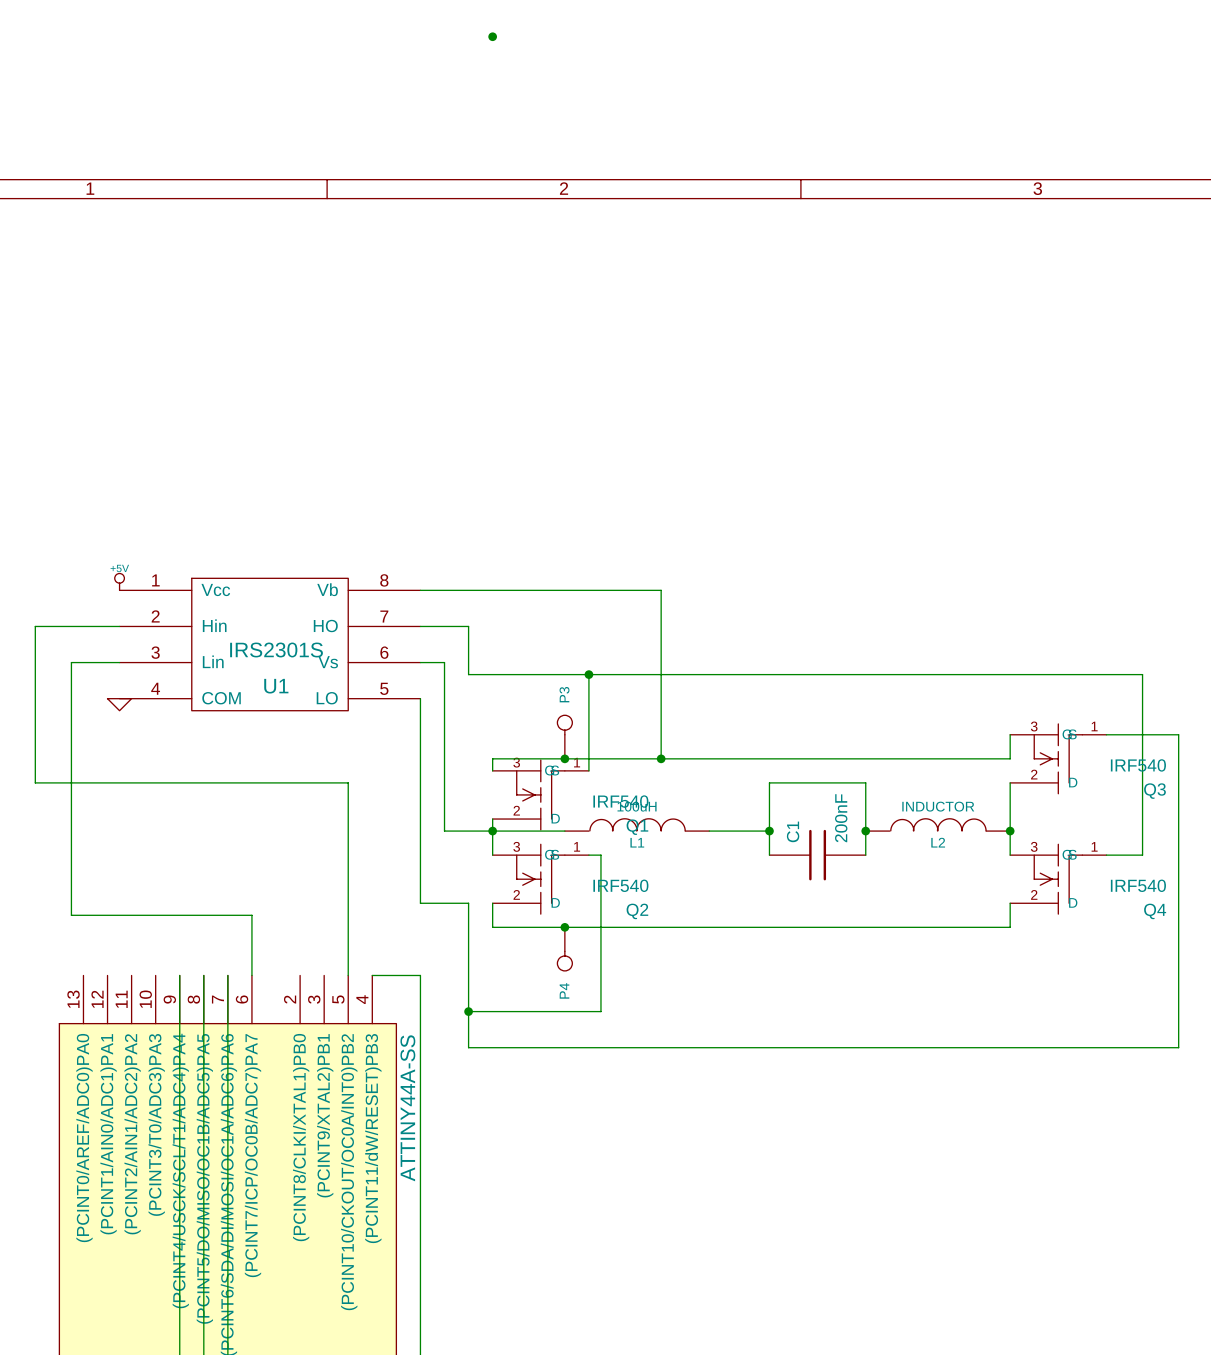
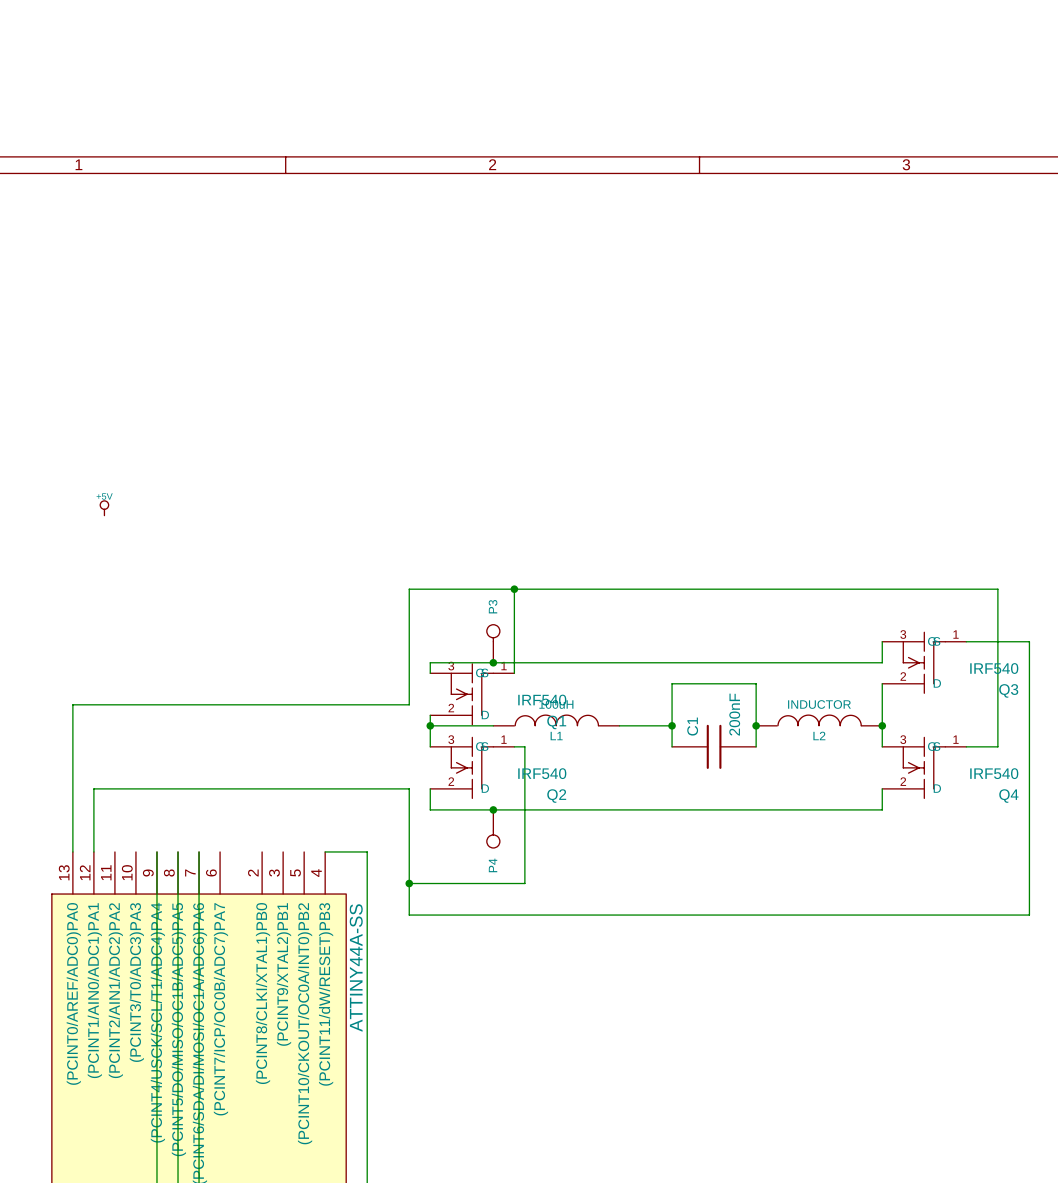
junction: (492, 36) -> none
wire: (420, 590) (661, 590) (661, 758) -> none
wire: (119, 626) (35, 626) (35, 782) (348, 782) (348, 975) -> none
wire: (420, 626) (468, 626) (468, 674) -> (72, 851) (72, 704) (409, 704) (409, 589)
U1: IRS2301S (270, 644) -> none
wire: (119, 662) (71, 662) (71, 915) (251, 915) (251, 975) -> none
wire: (420, 662) (444, 662) (444, 831) (492, 831) -> none
wire: (420, 698) (420, 903) -> (93, 851) (93, 788) (367, 788)
power symbol: (119, 704) -> none
junction: (661, 758) -> none

